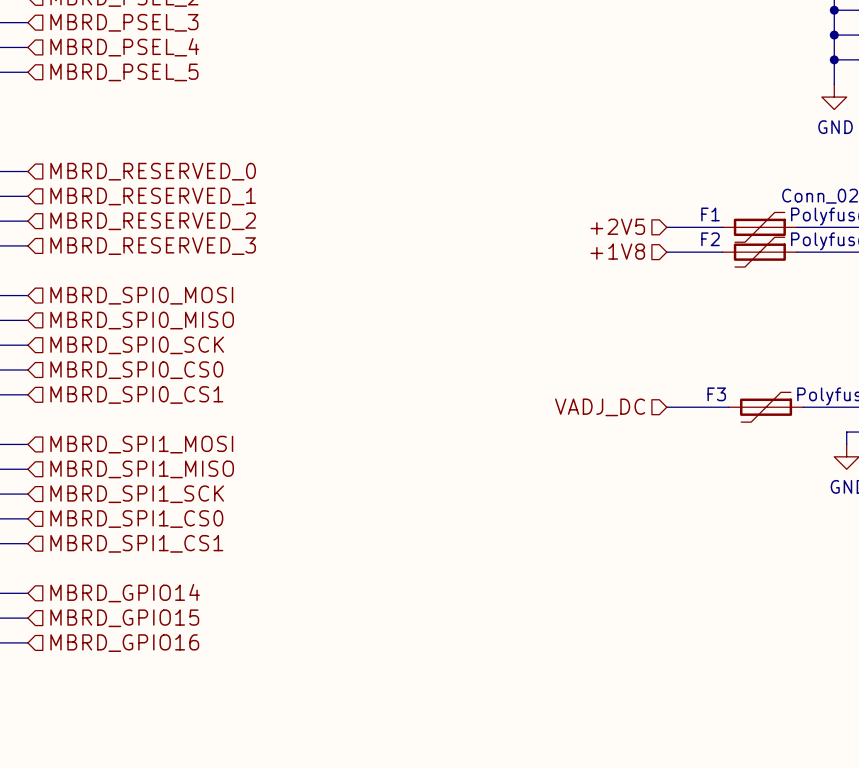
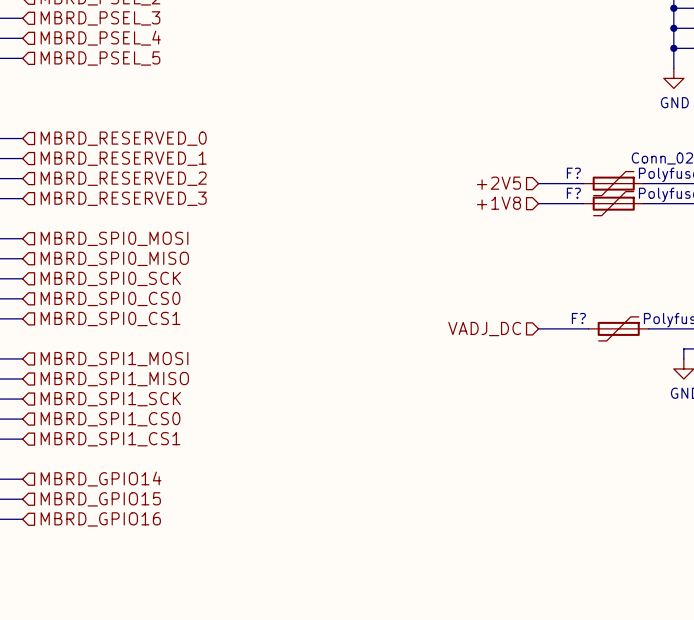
F1 name: F1 (710, 214) -> F? (573, 173)
F2 name: F2 (710, 239) -> F? (573, 193)
F3 name: F3 (716, 394) -> F? (578, 318)

